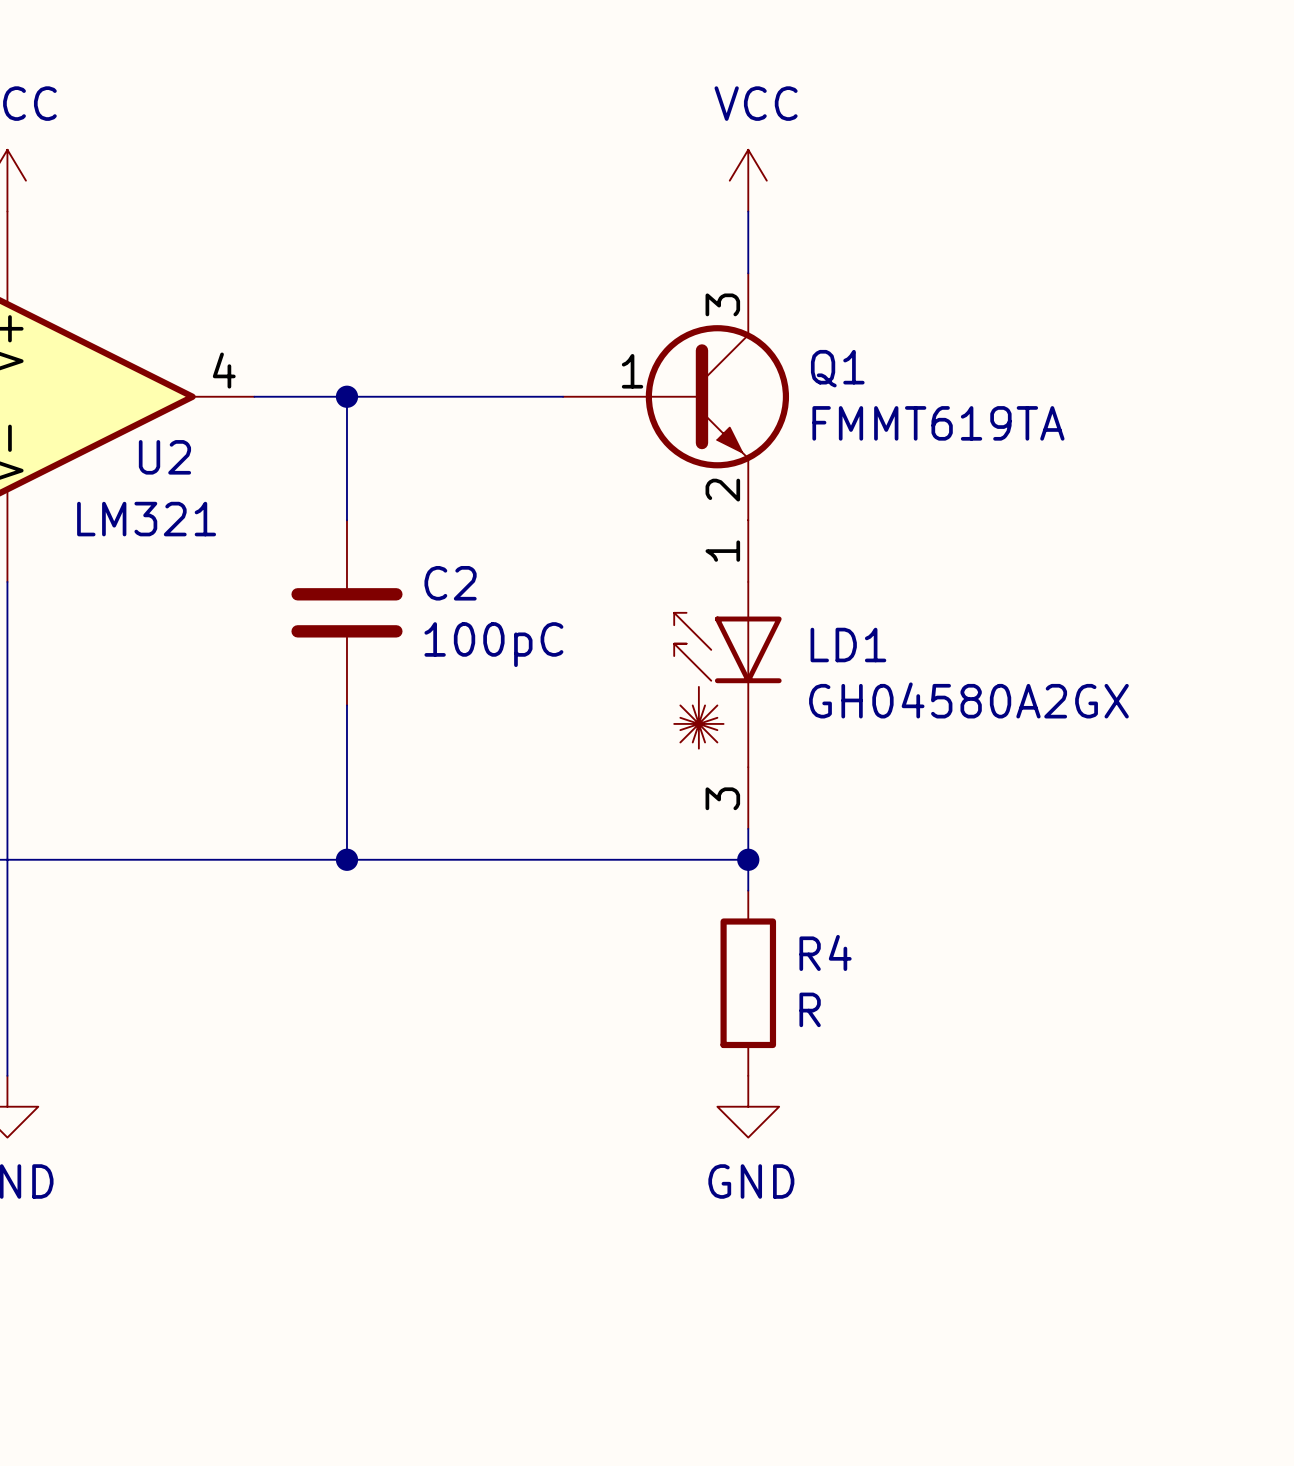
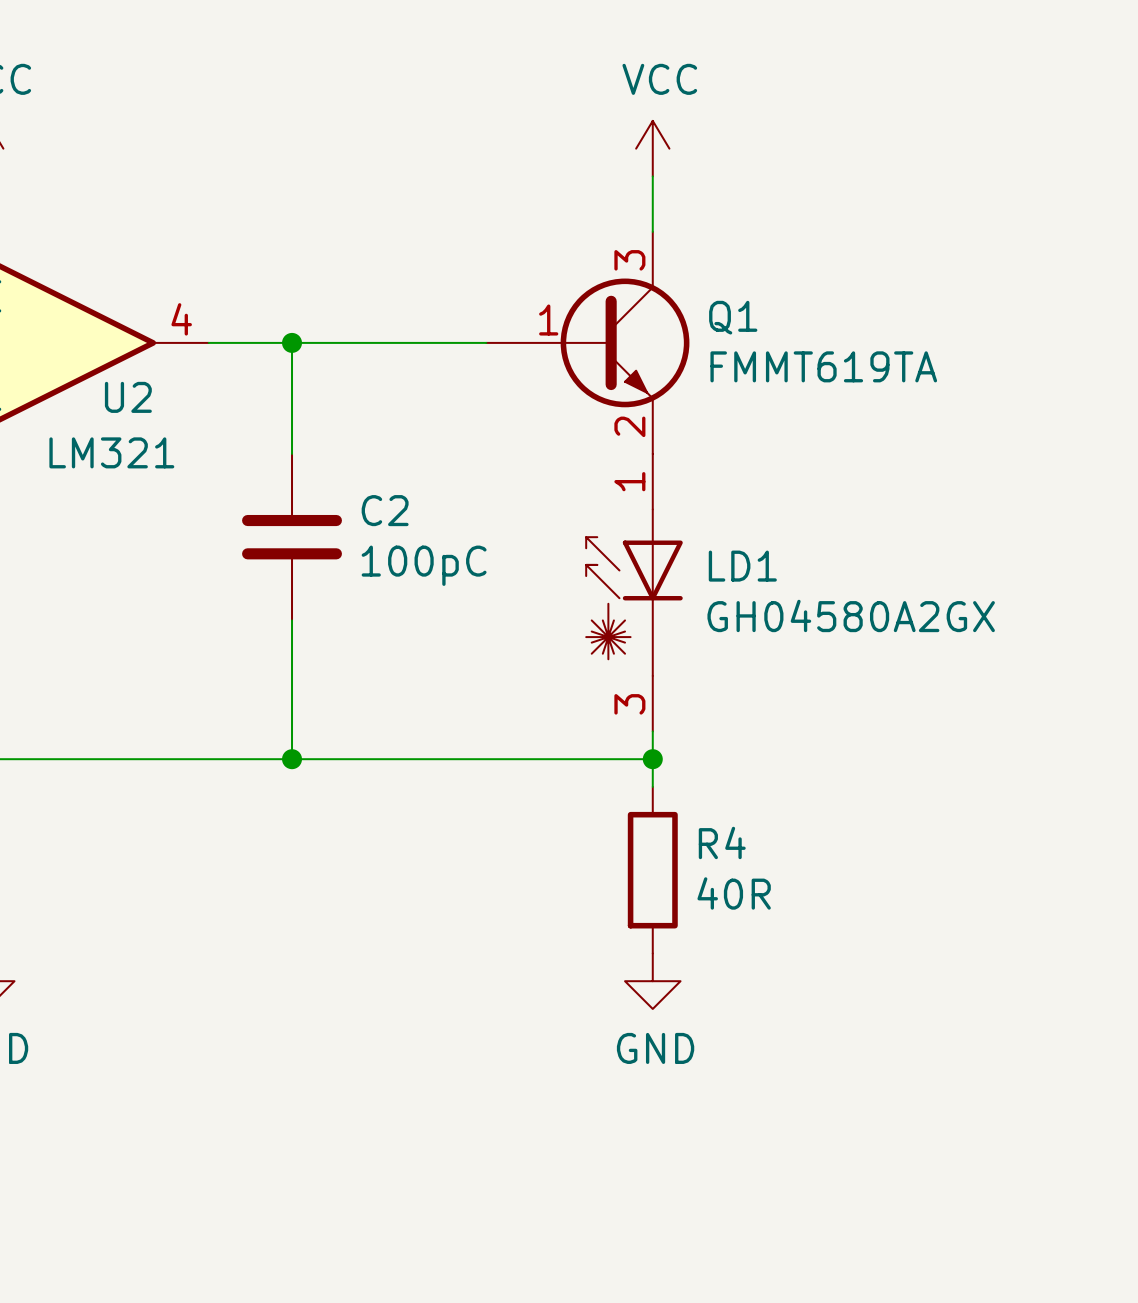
R4 value: R (810, 1009) -> 40R (734, 893)

